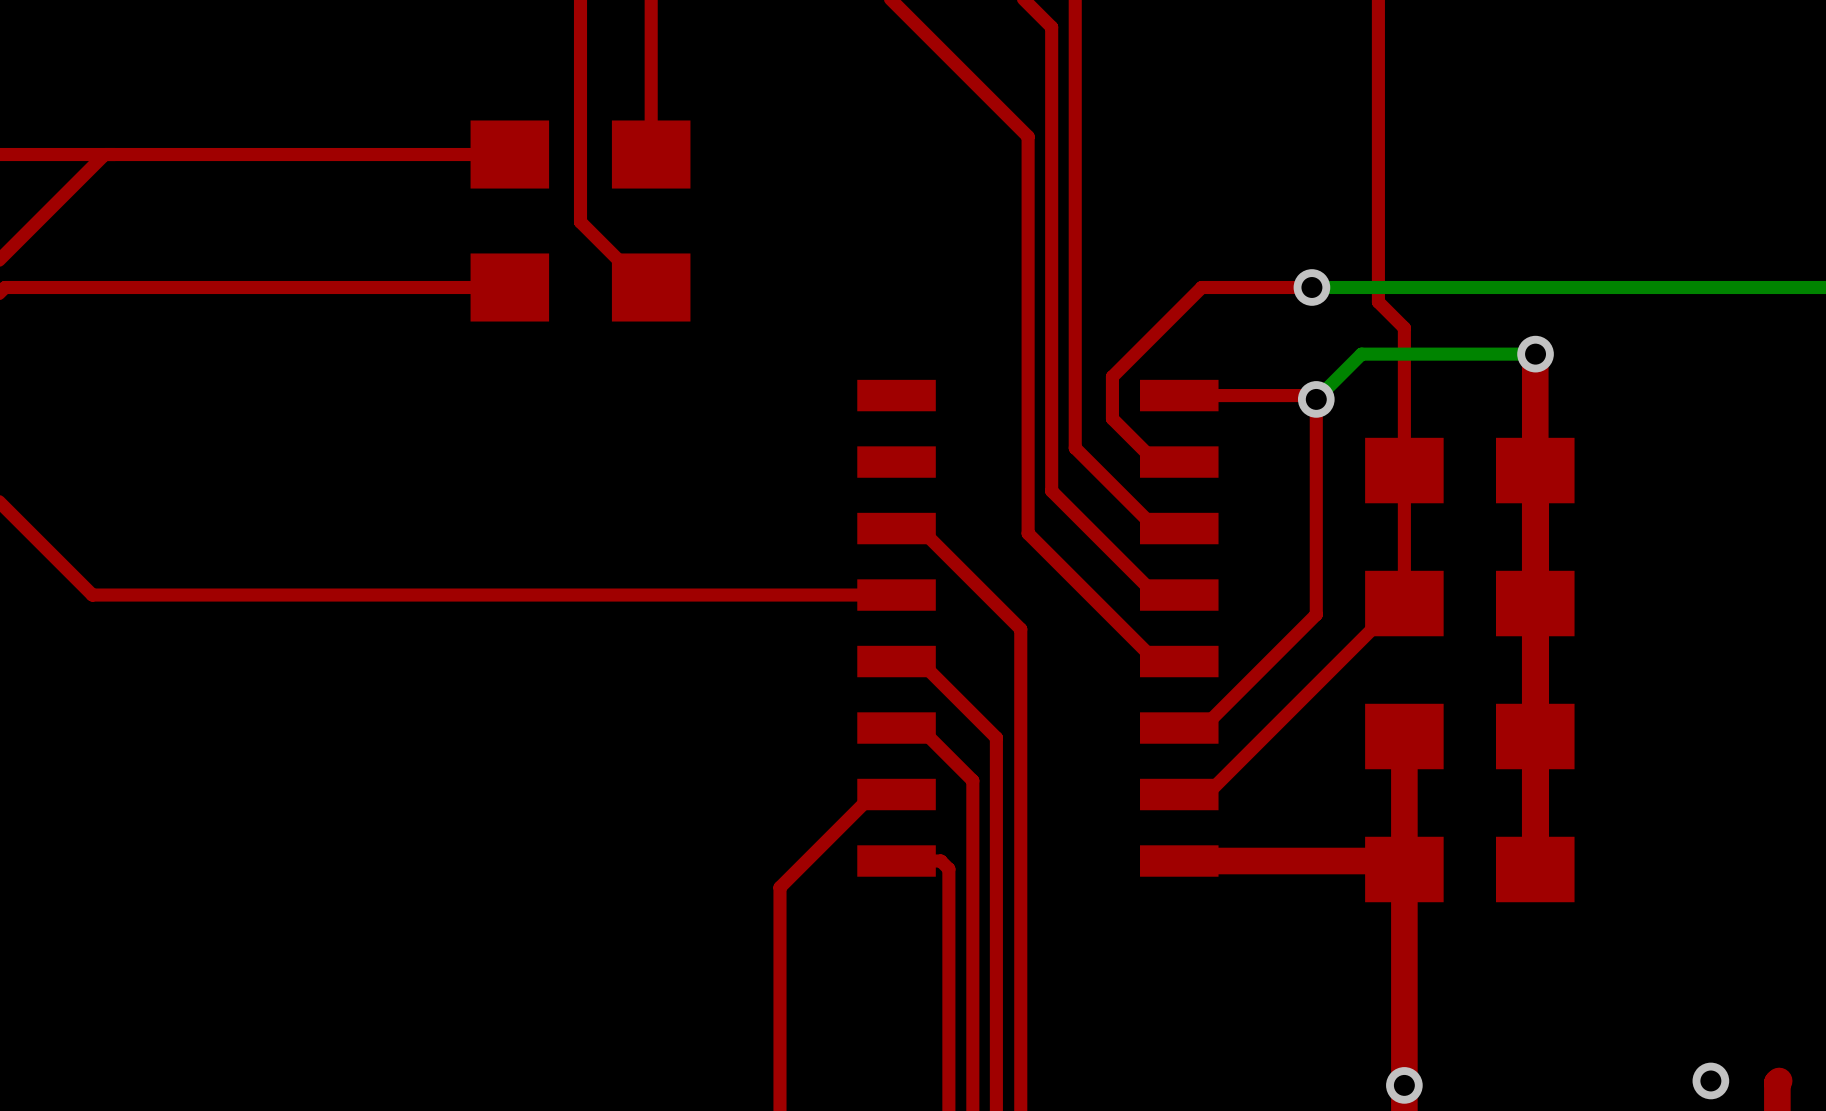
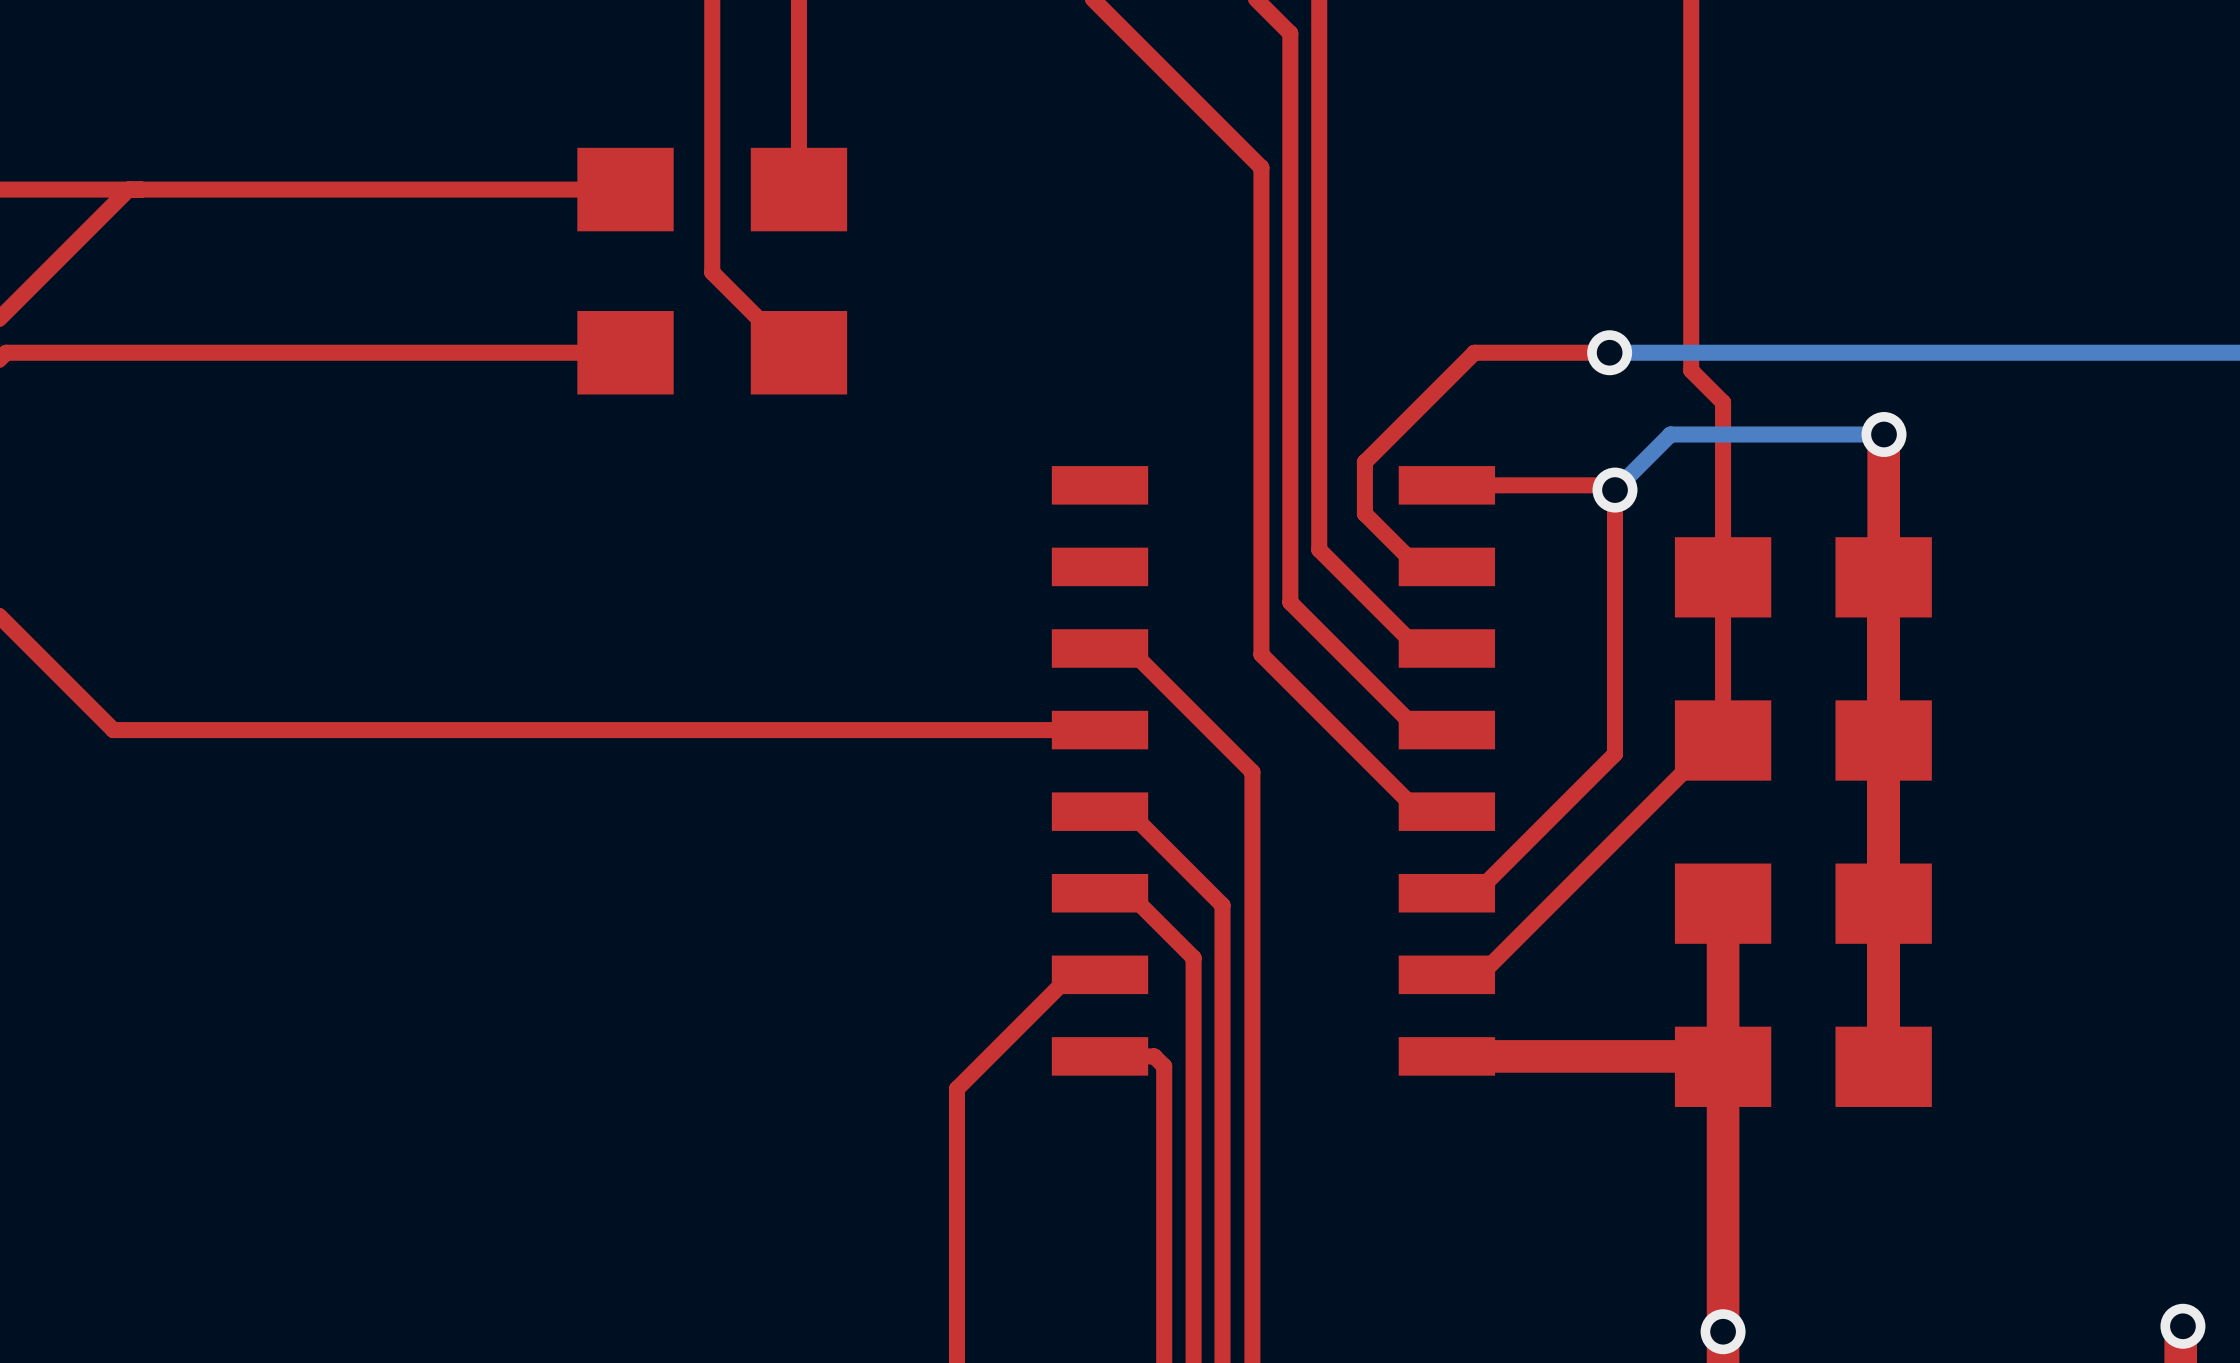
via position: (1710, 1080) -> (2182, 1326)

